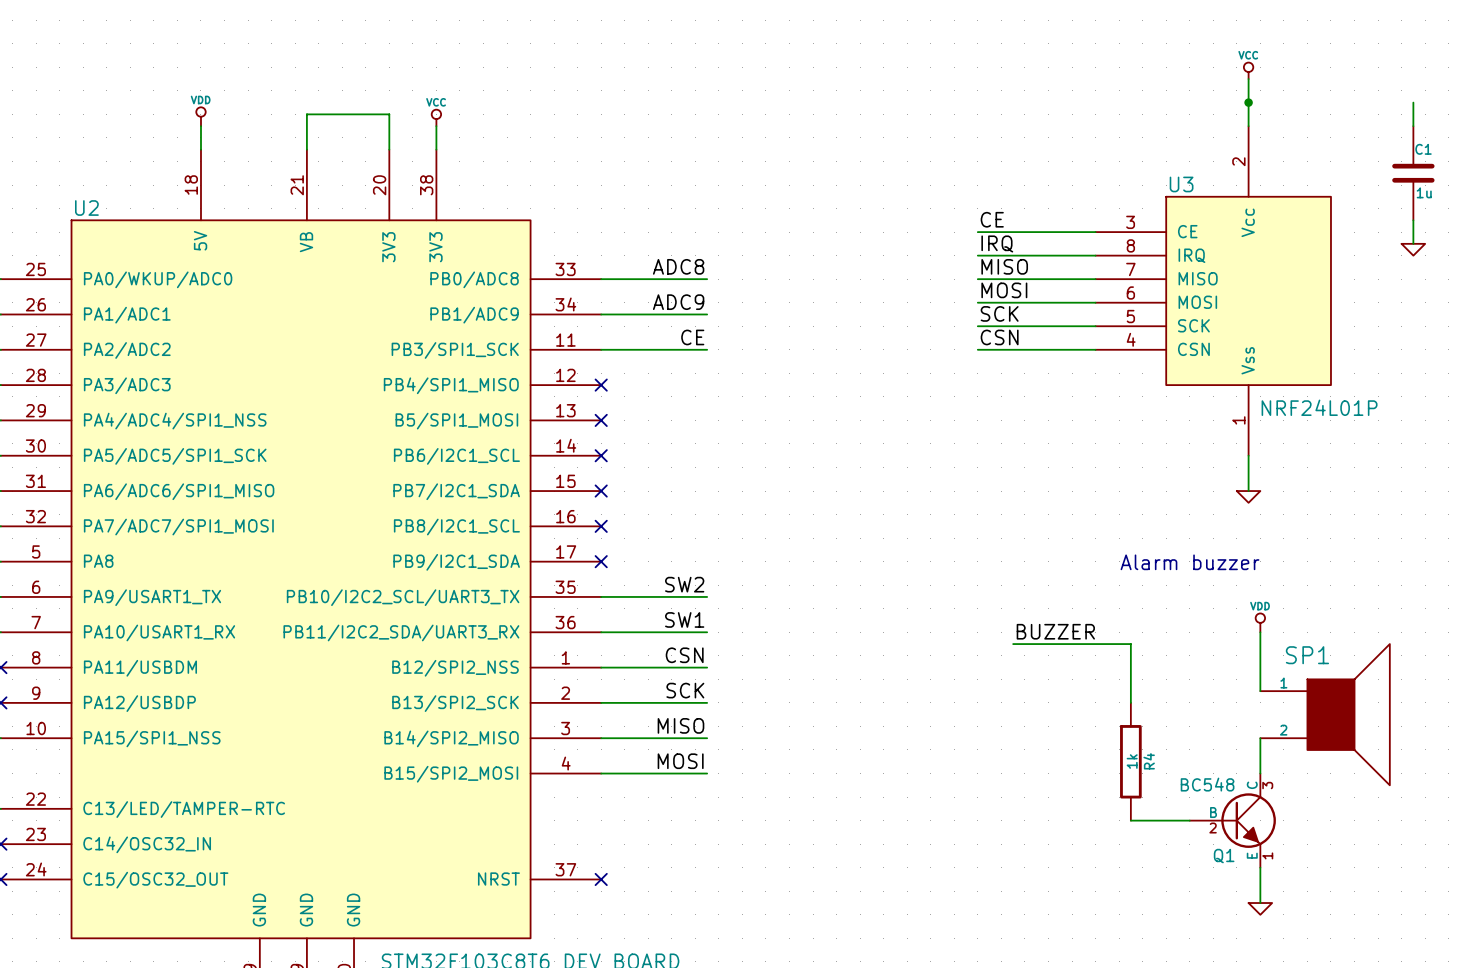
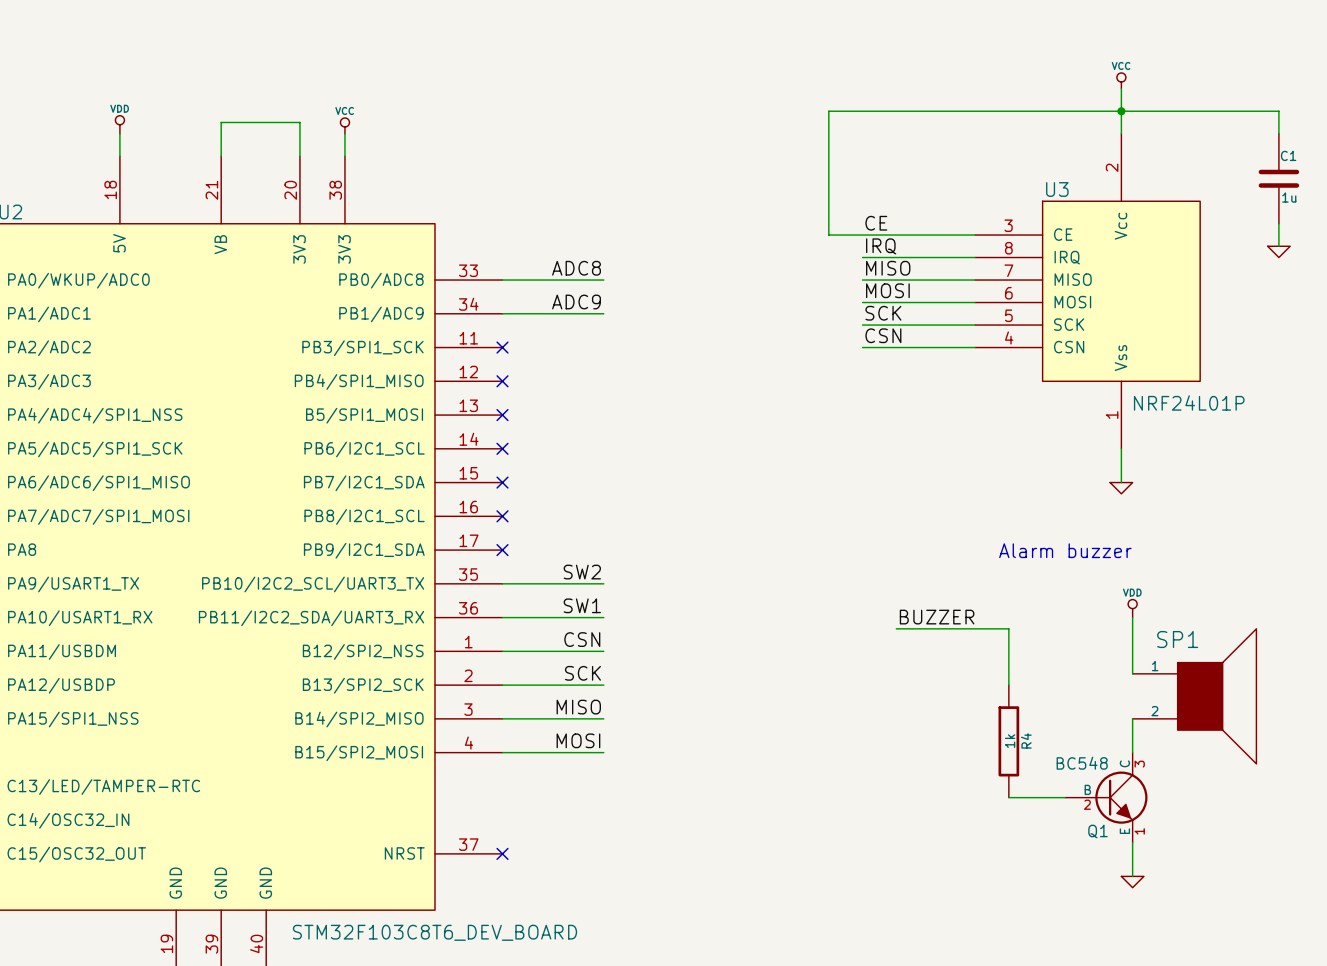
wire: none -> (1278, 111) (828, 111) (828, 235) (862, 235)
label: CE (692, 337) -> none
wire: (601, 349) (707, 349) -> none
no-connect mark: none -> (502, 347)

